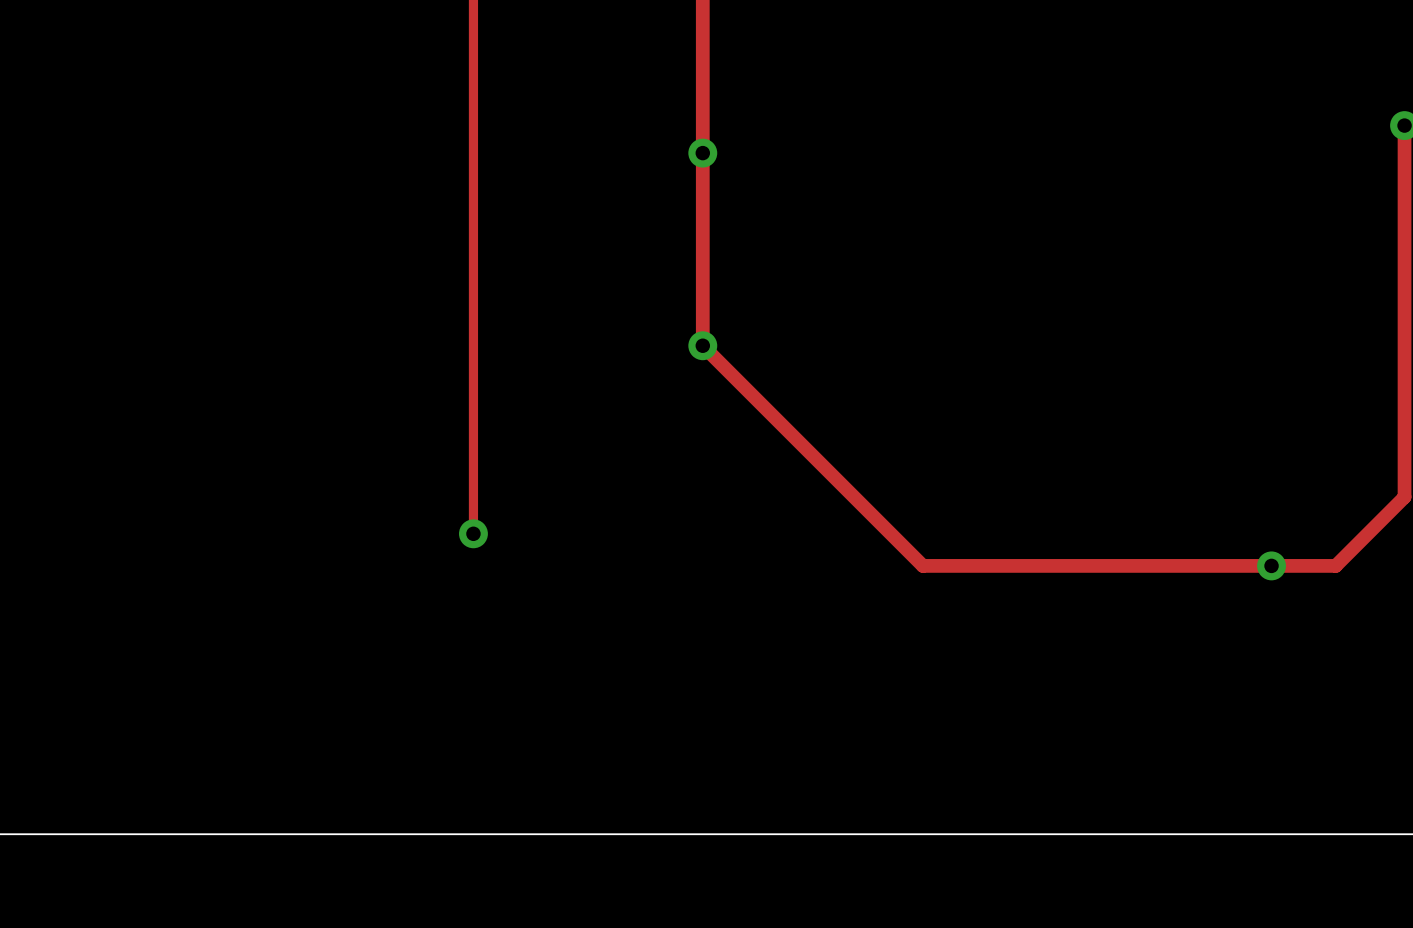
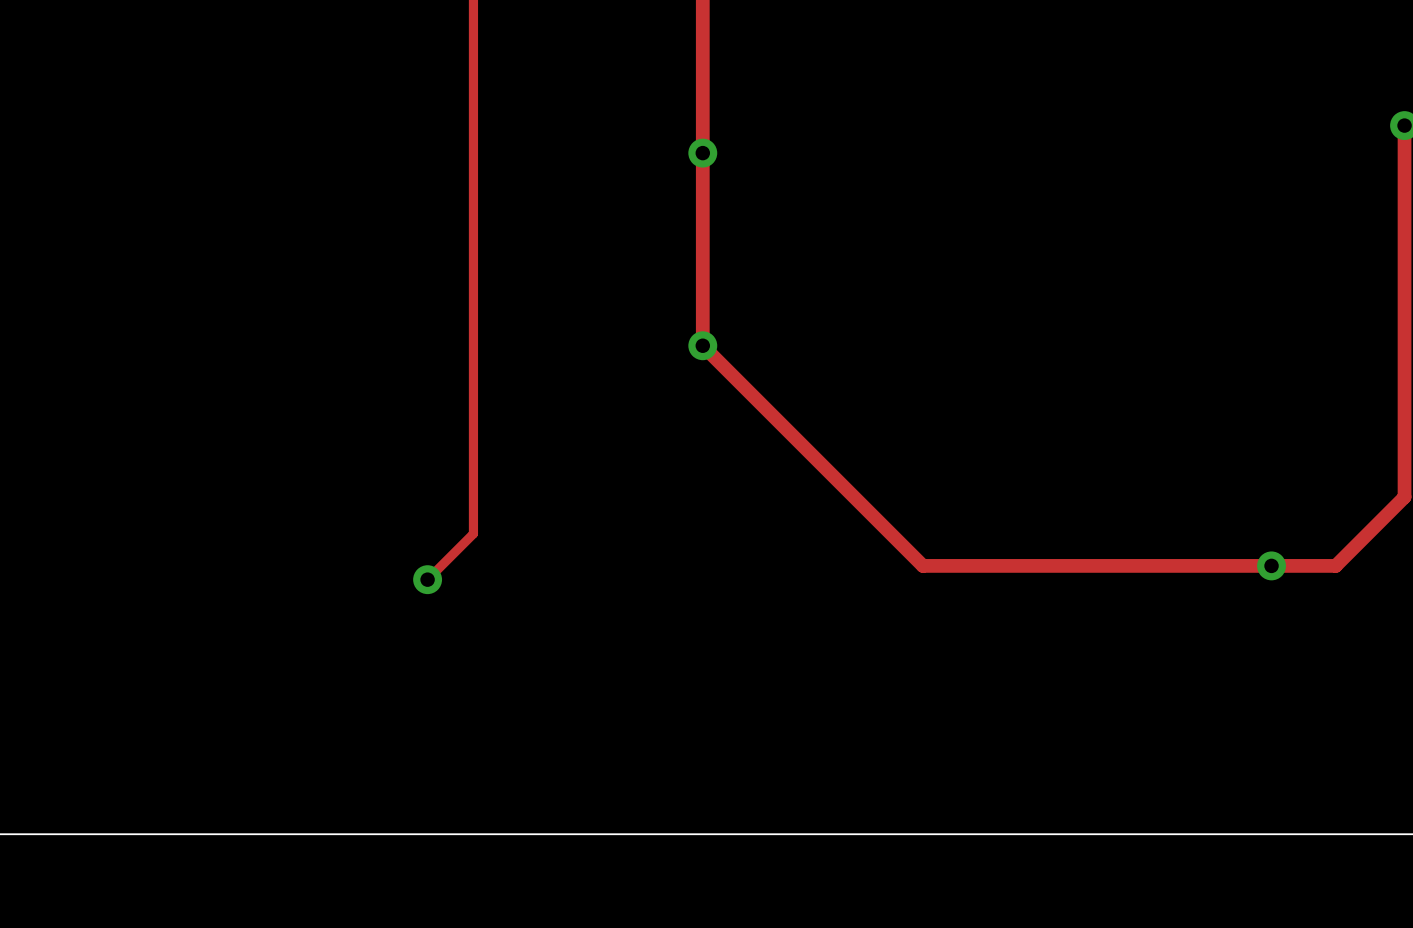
track: none -> (473, 533) (427, 579)
via position: (473, 533) -> (427, 579)

